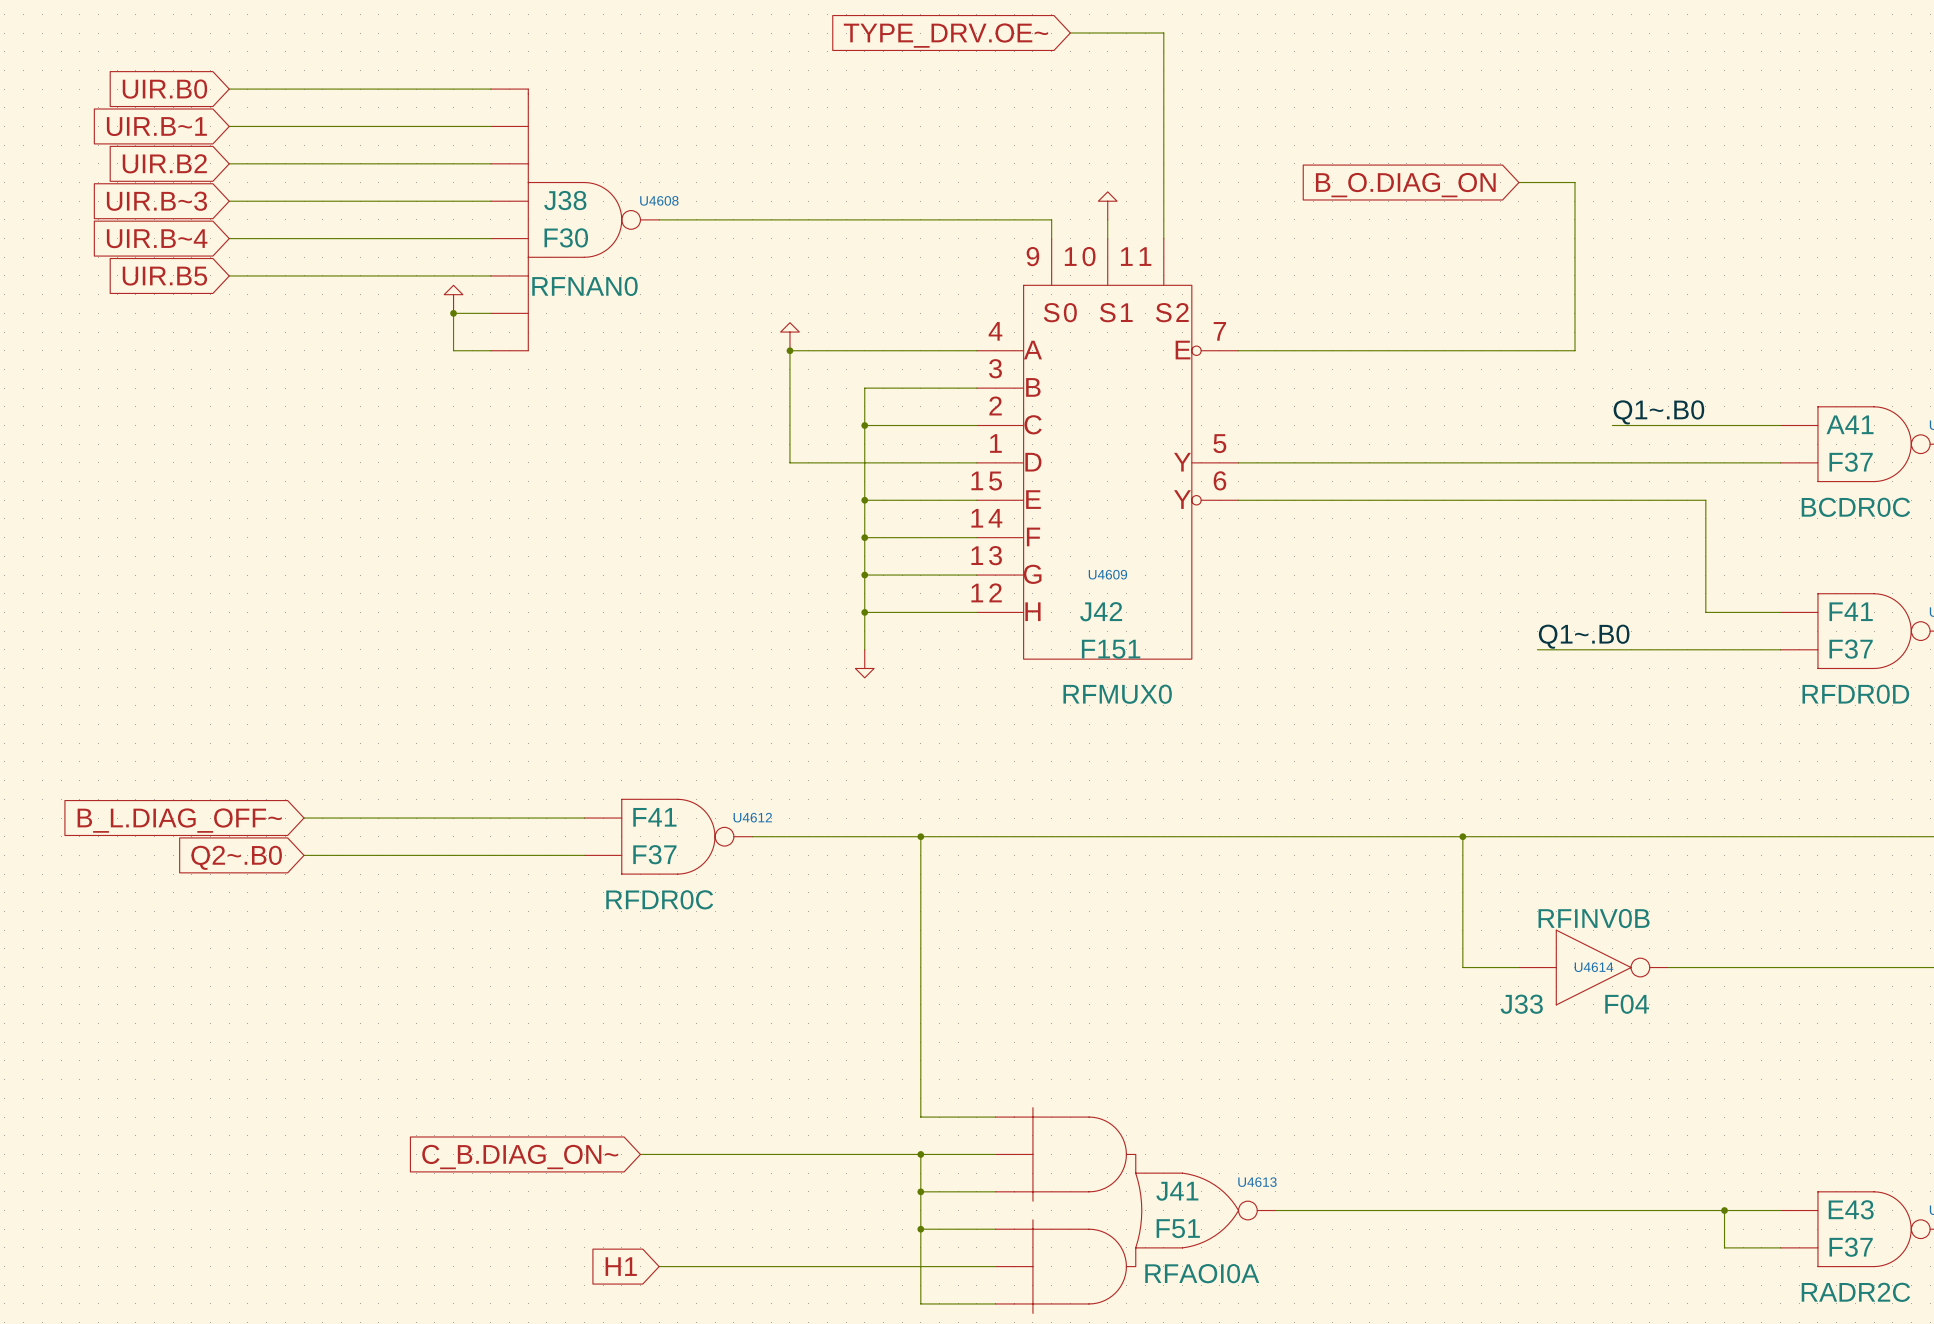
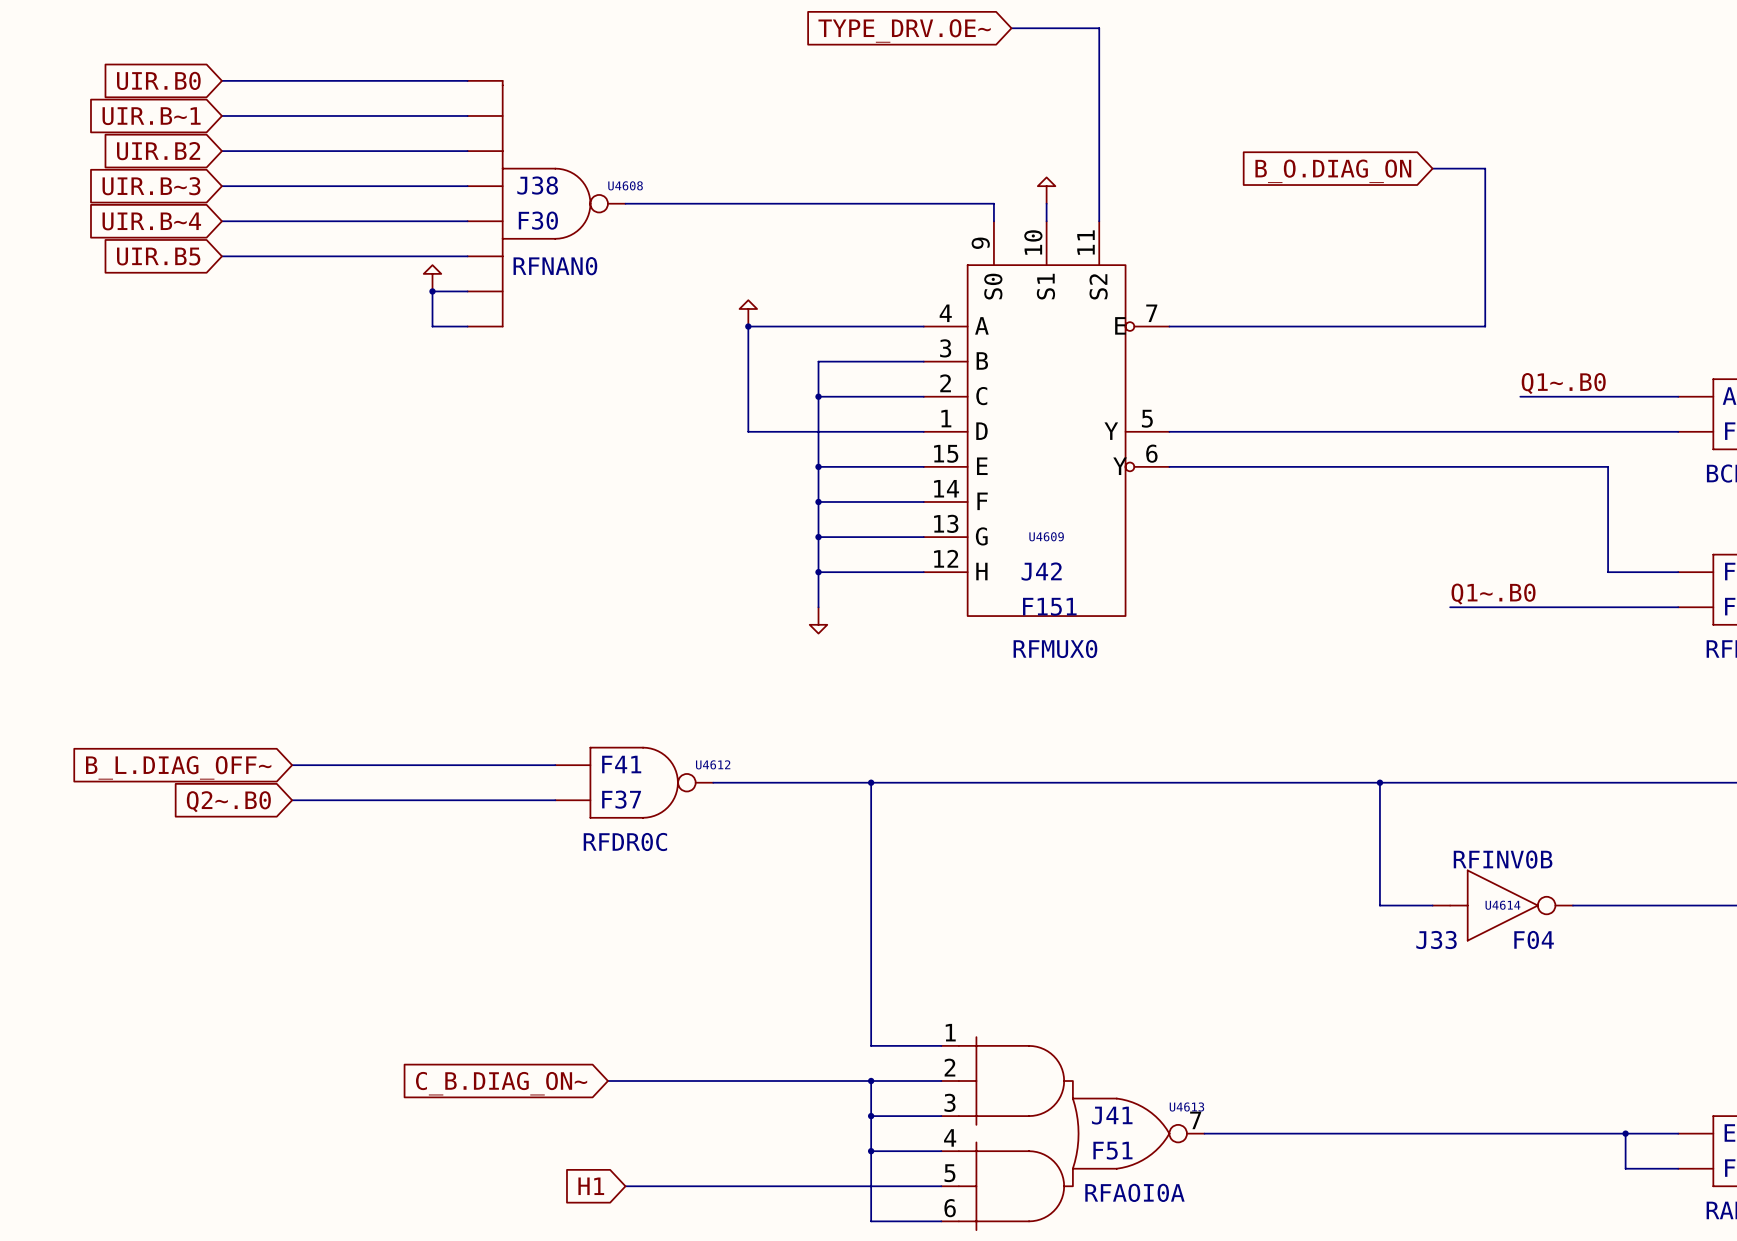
U4609 symbol: [976, 238, 1239, 660] -> [923, 221, 1170, 617]
U4613 pin number: none -> 1 (950, 1032)
U4613 pin number: none -> 2 (949, 1067)
U4613 pin number: none -> 3 (950, 1102)
U4613 pin number: none -> 7 (1195, 1120)
U4613 pin number: none -> 4 (950, 1137)
U4613 pin number: none -> 5 (949, 1173)
U4613 pin number: none -> 6 (950, 1208)

